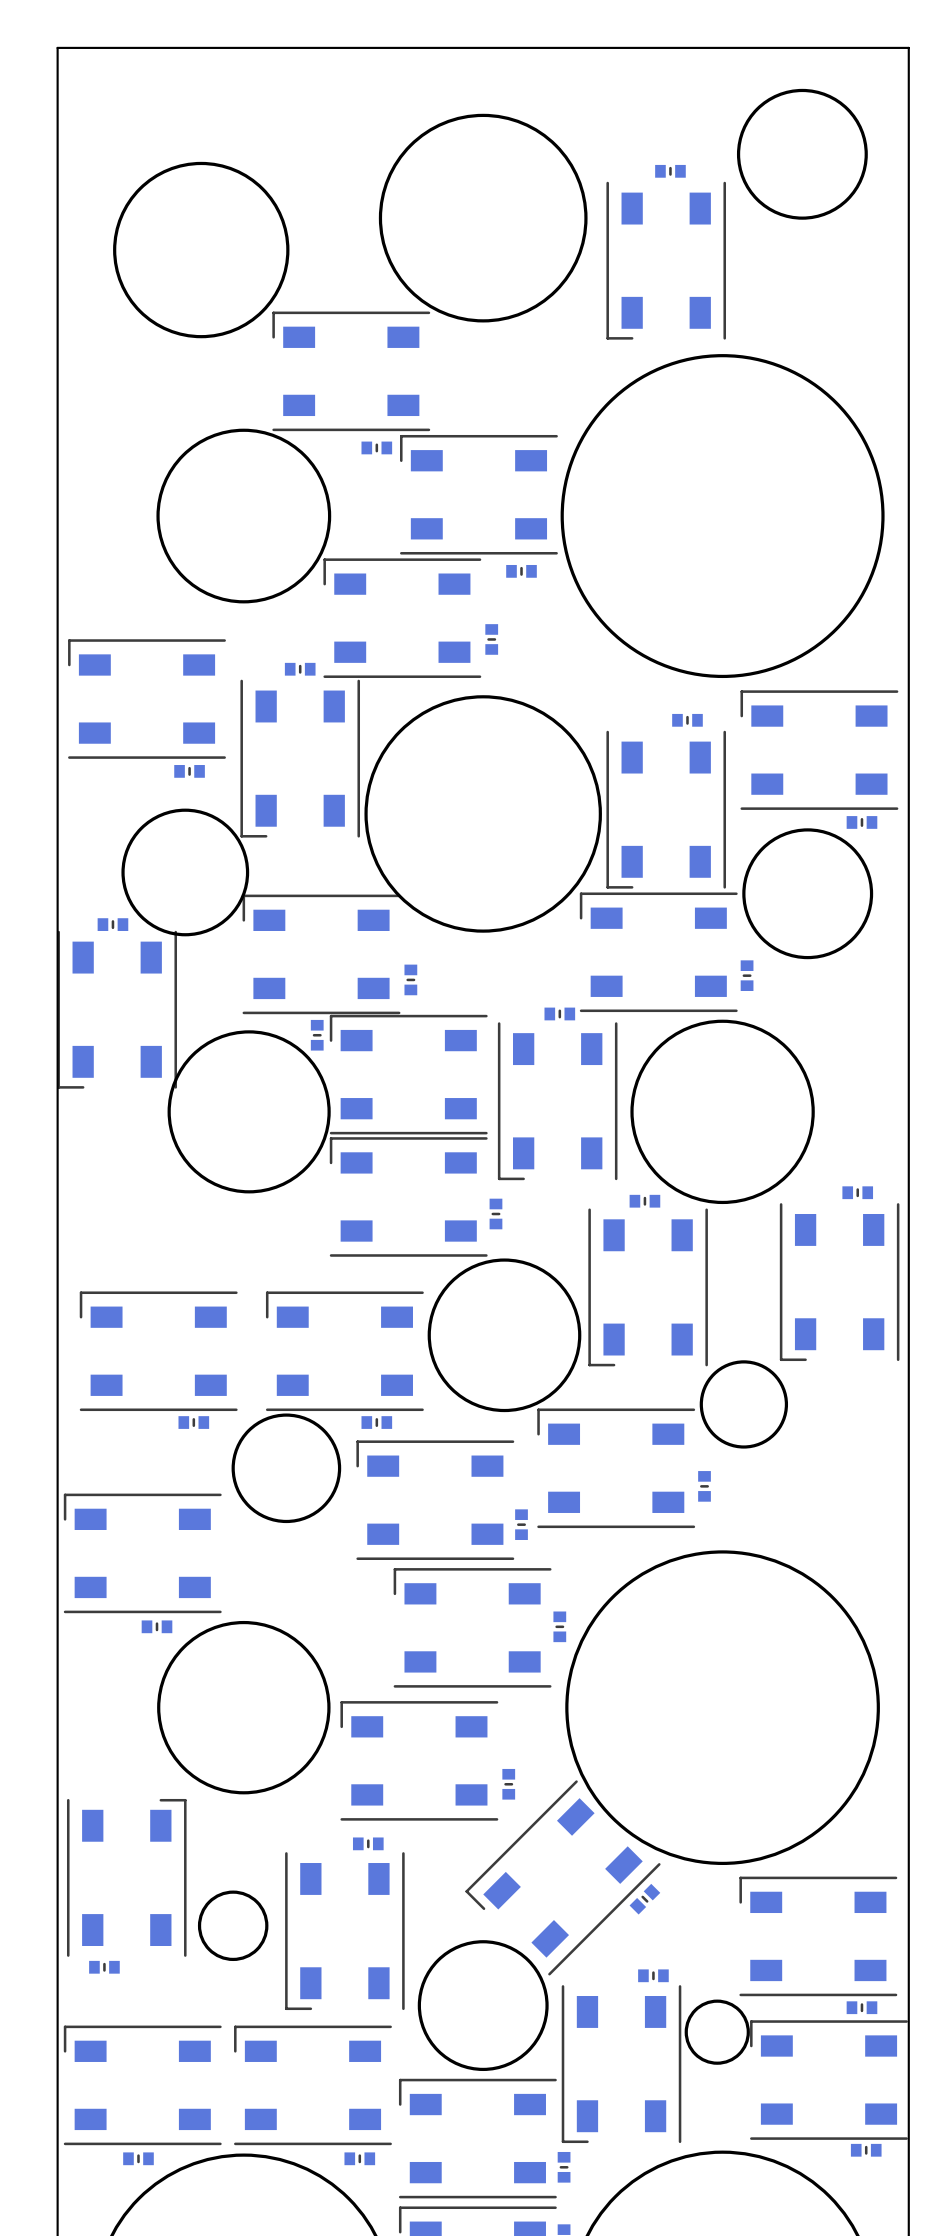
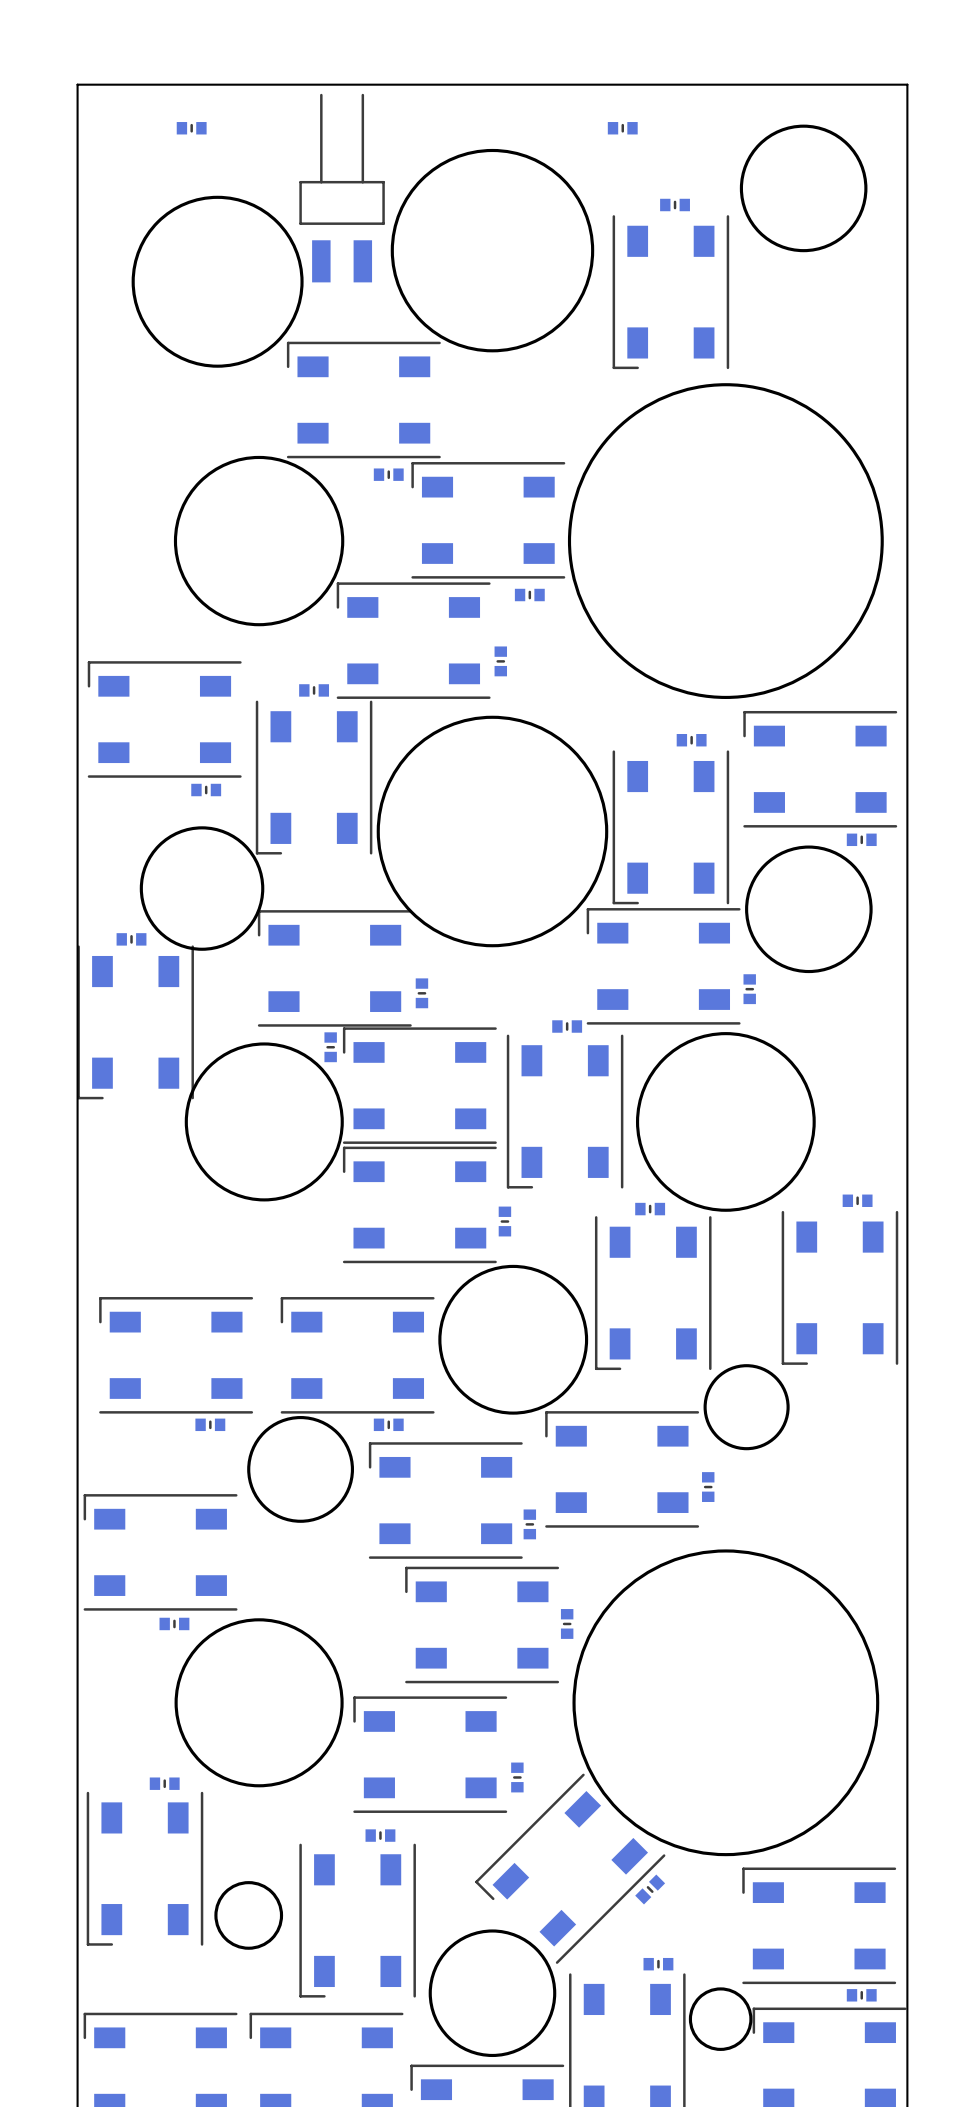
part: none -> (191, 128)
part: none -> (622, 128)
part: none -> (342, 188)
part rotation: 0° (126, 1877) -> 180° (145, 1868)
part position: (104, 1967) -> (164, 1783)

